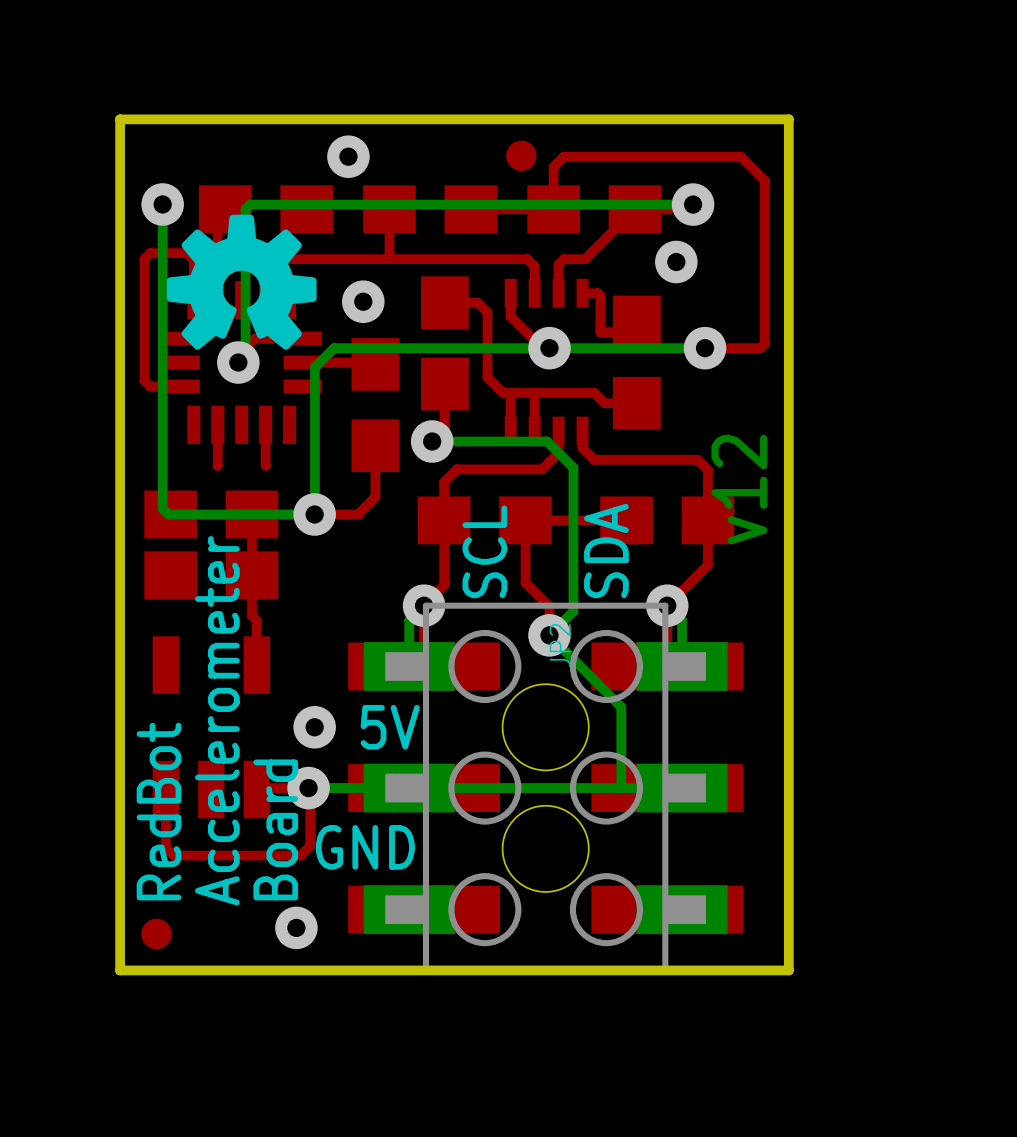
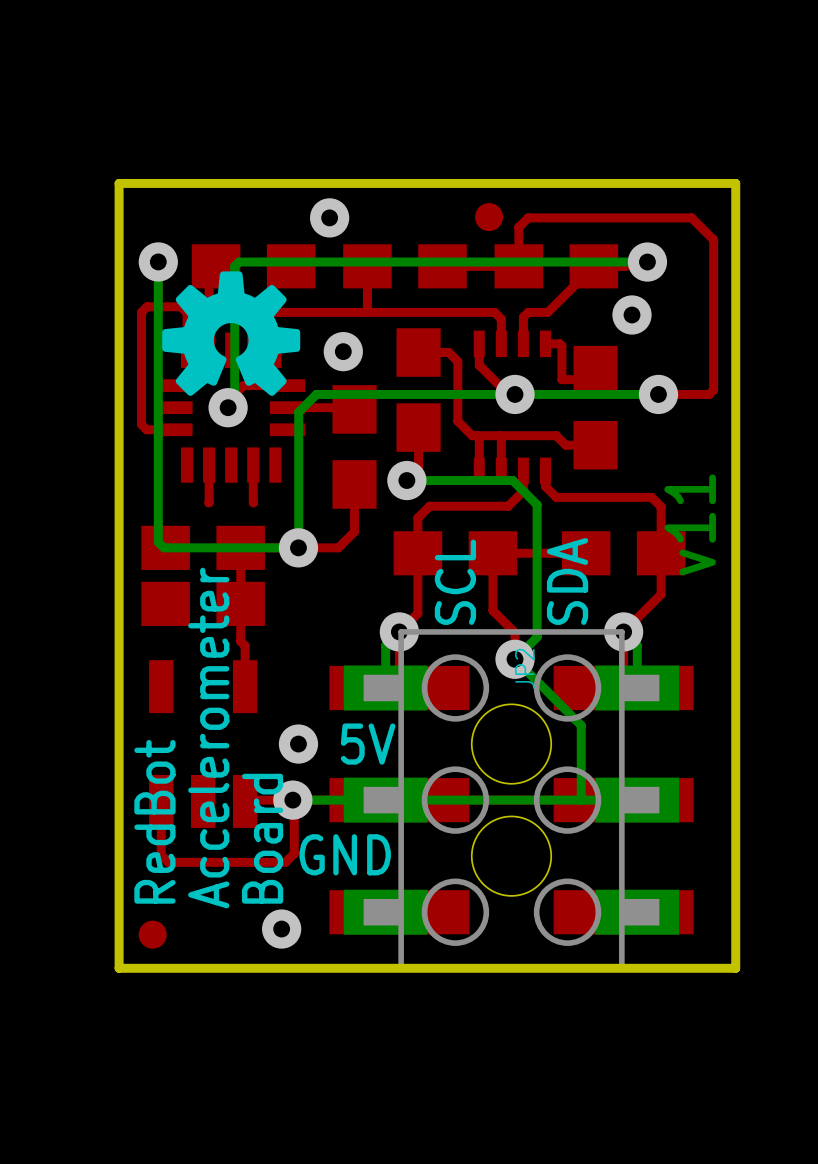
text: v12 (739, 489) -> v11 (690, 524)

